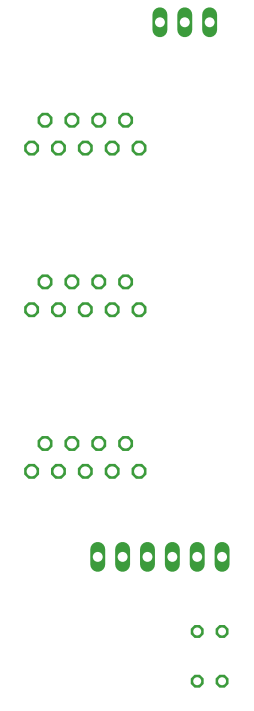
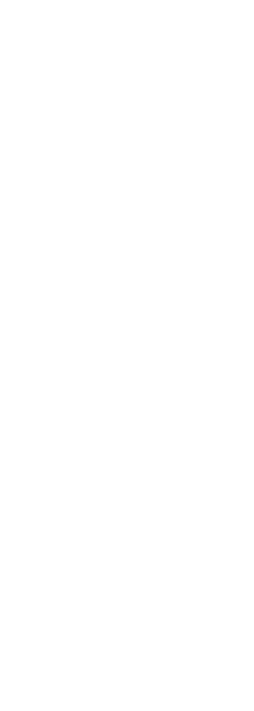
part: (184, 22) -> none
part: (85, 134) -> none
part: (85, 295) -> none
part: (85, 457) -> none
part: (159, 556) -> none
part: (209, 631) -> none
part: (209, 681) -> none

